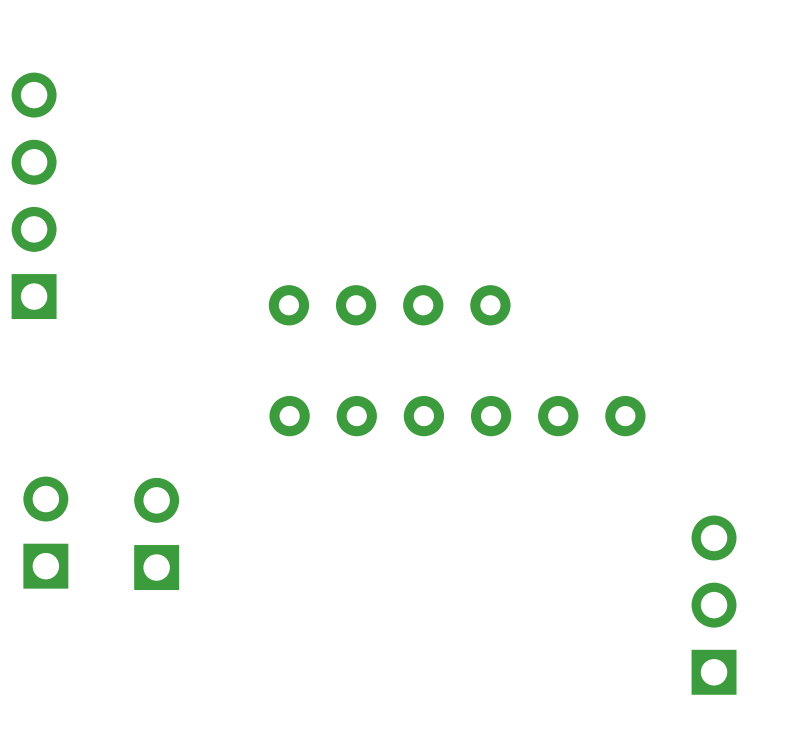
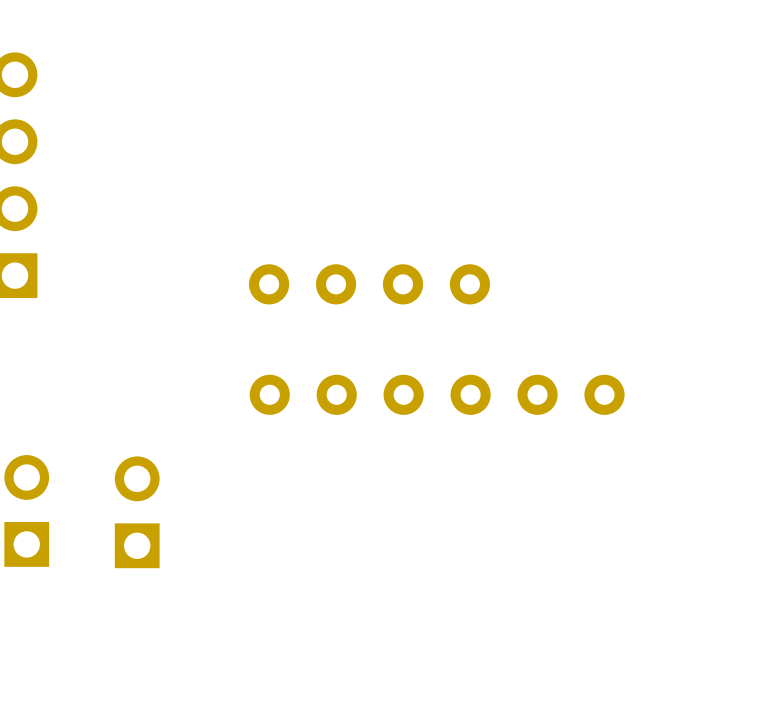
part: (714, 605) -> none

